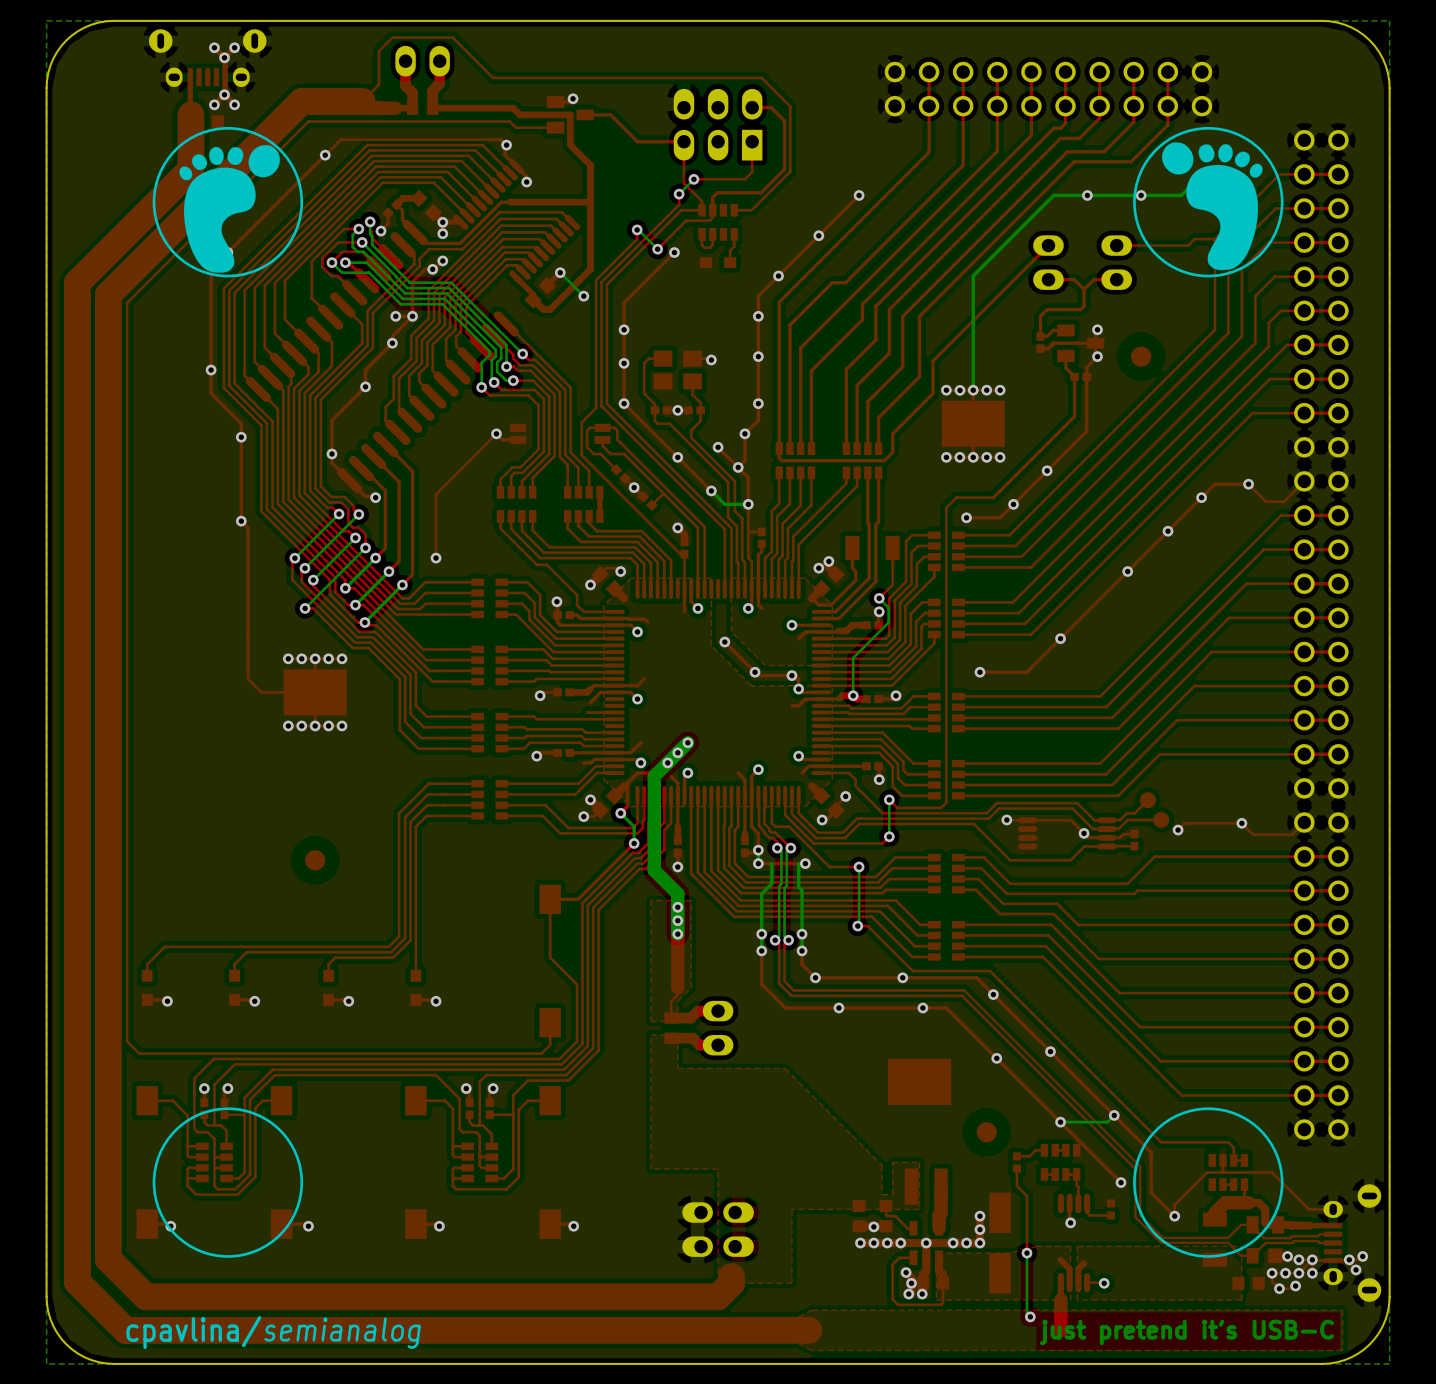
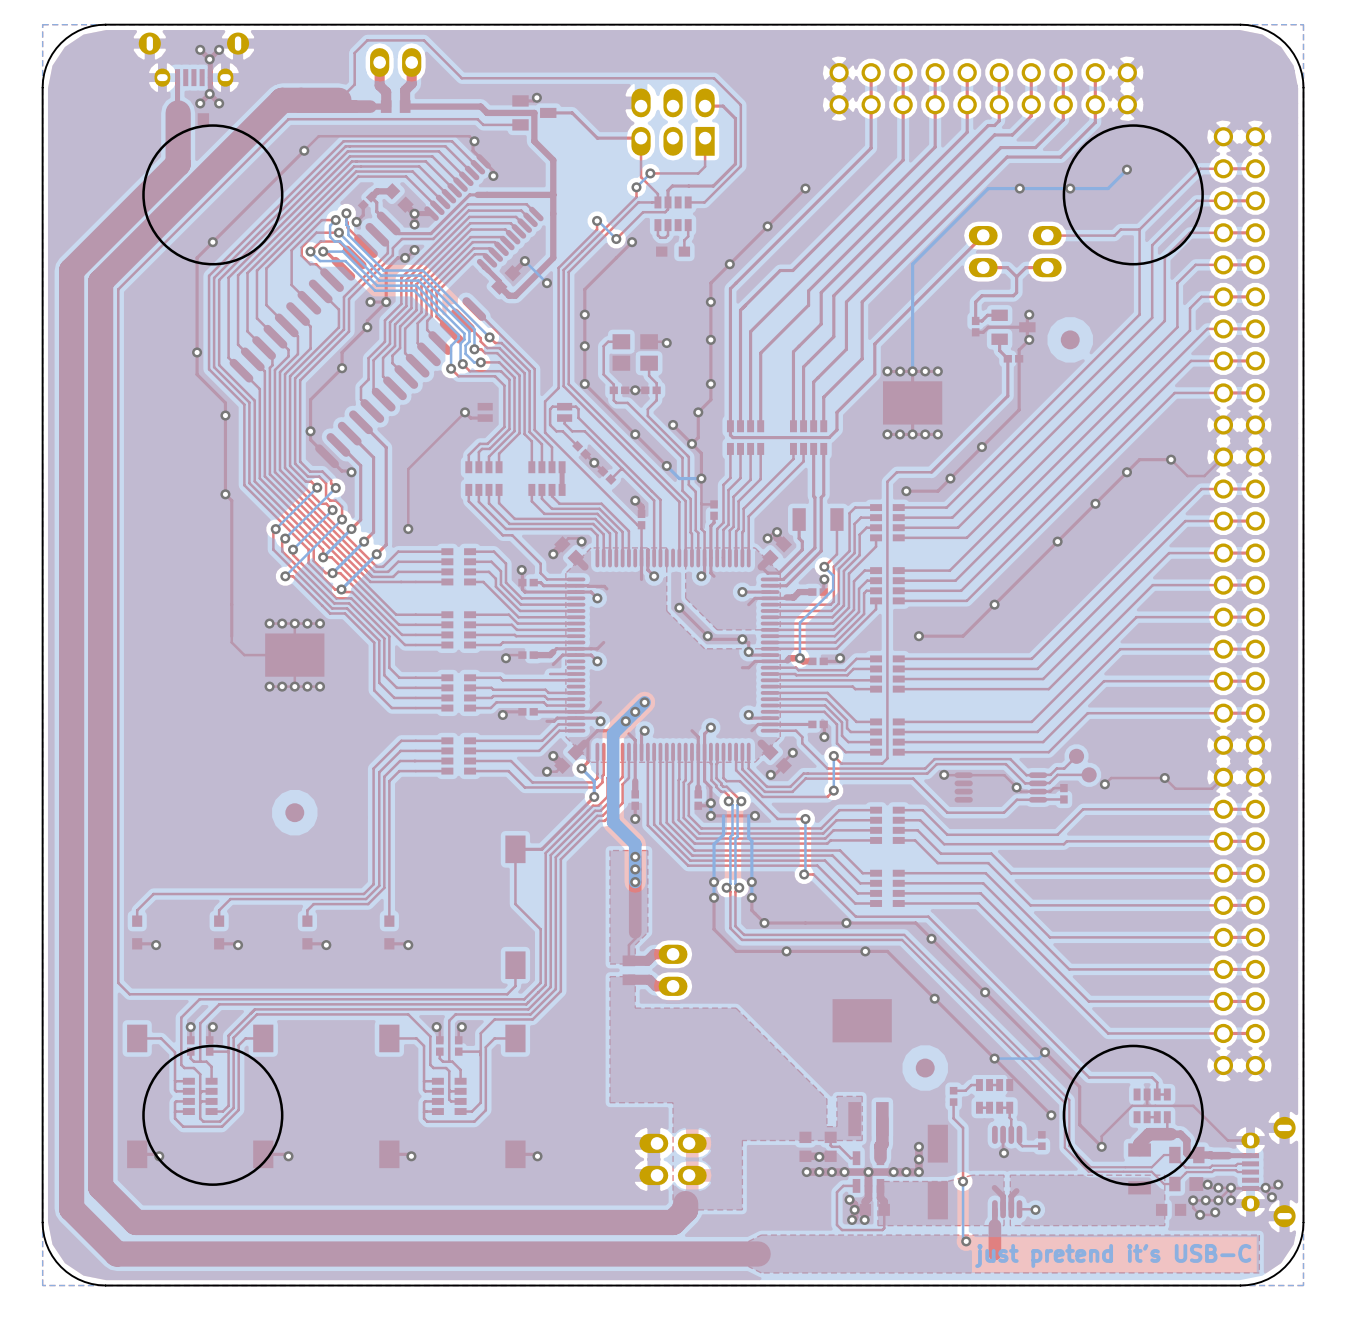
drawing: [1162, 142, 1263, 271] -> none
drawing: [179, 145, 280, 273] -> none
text: cpavlina/ (193, 1332) -> none
text: semianalog (342, 1333) -> none

